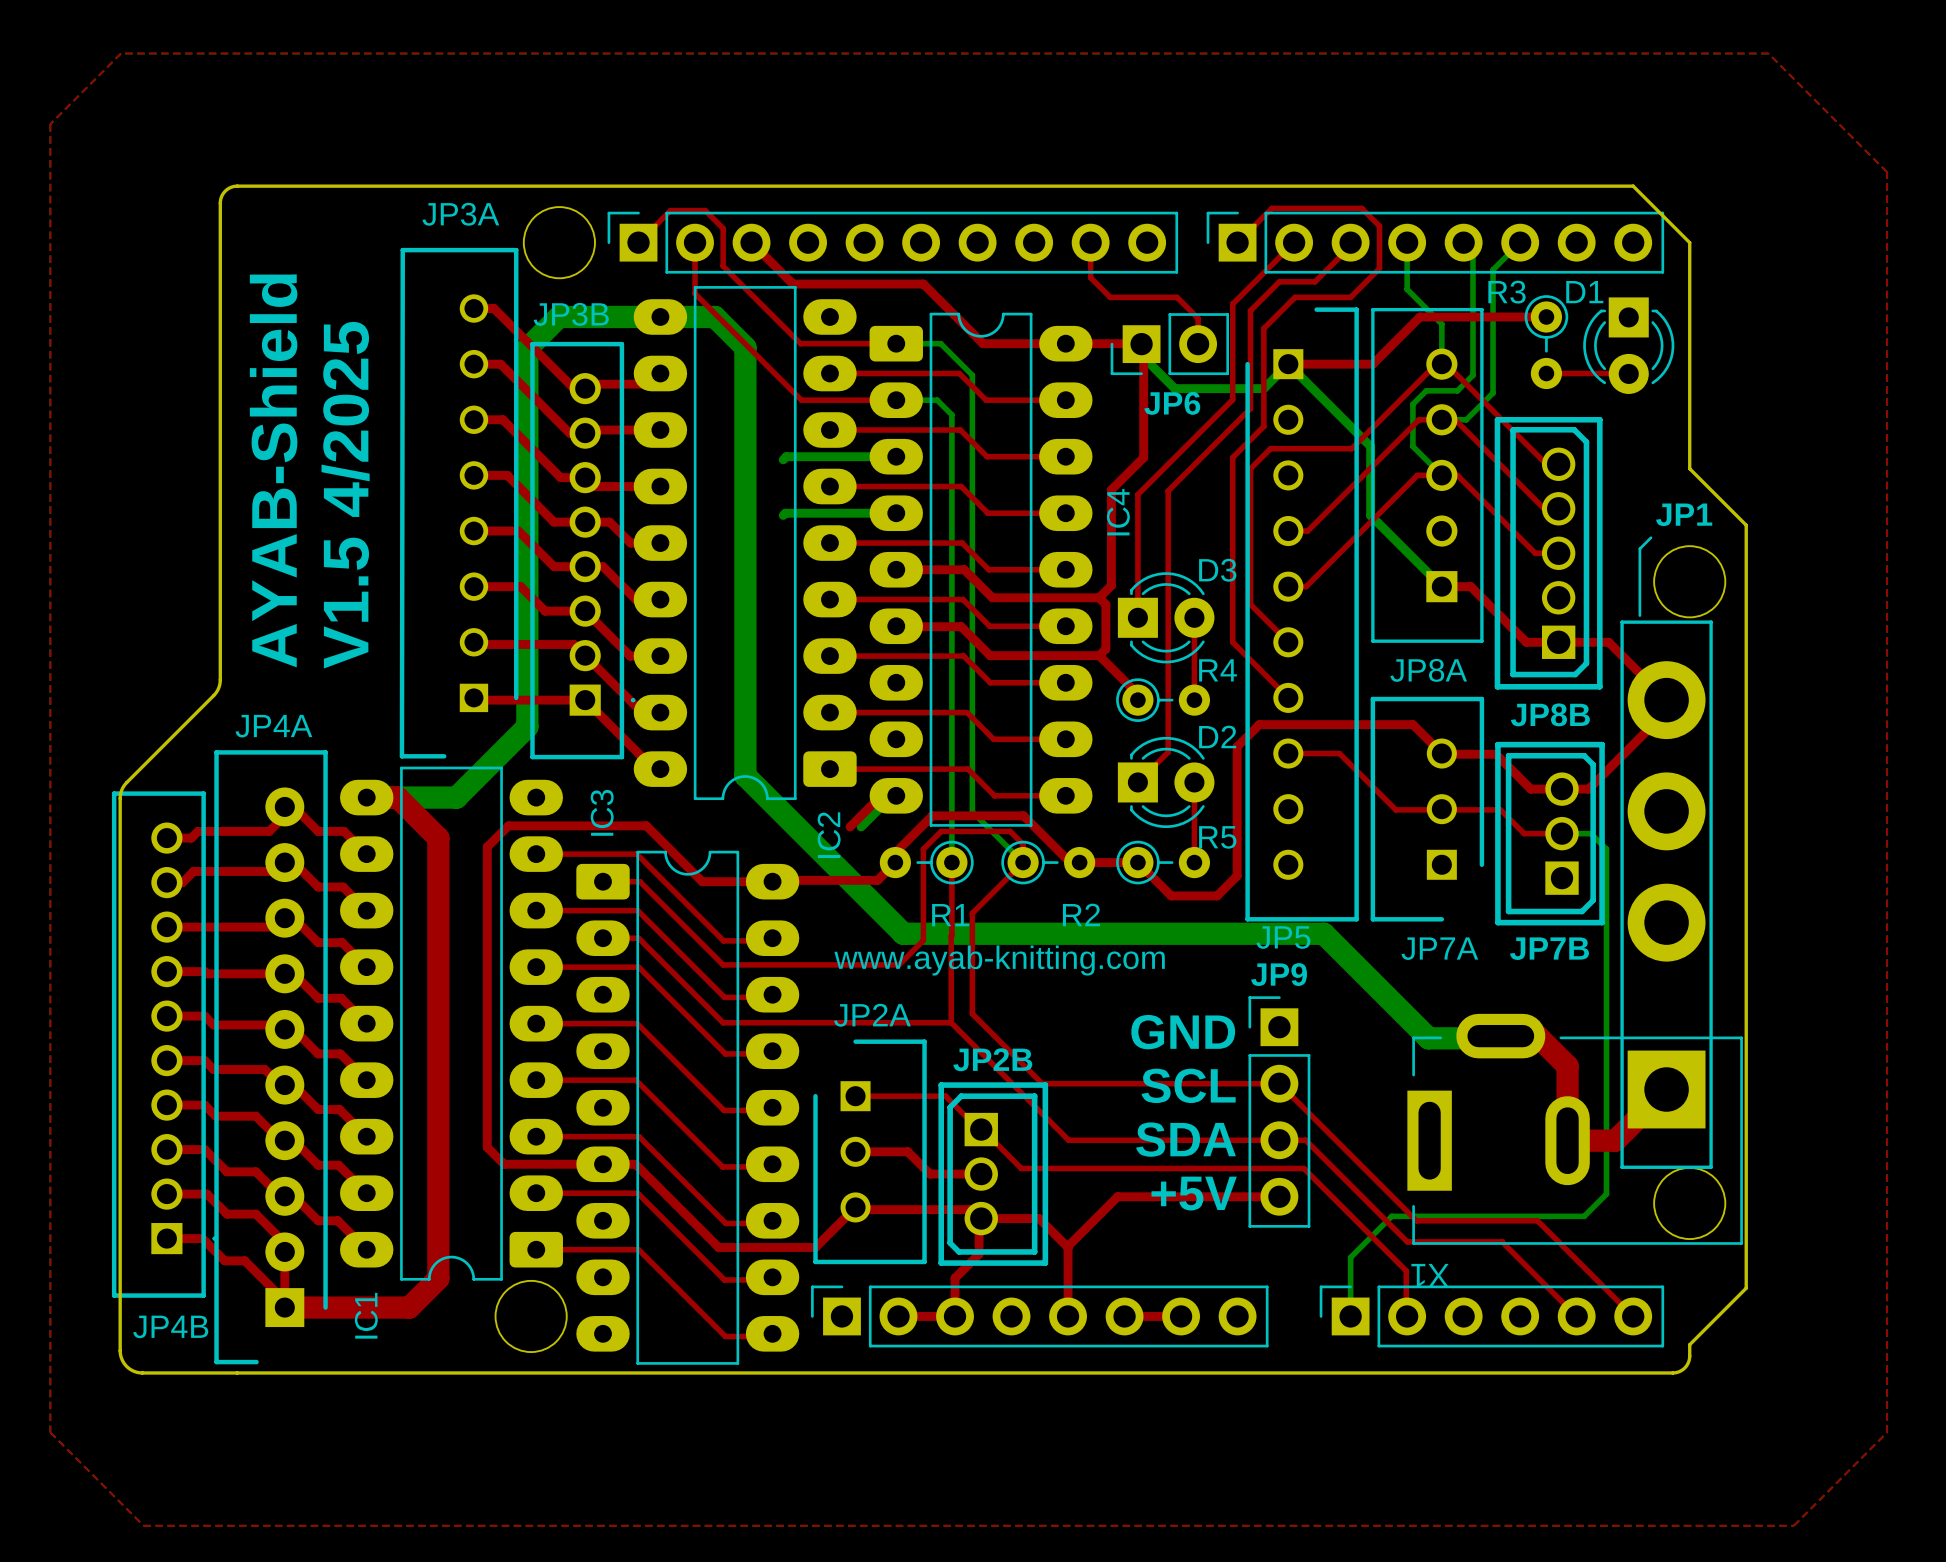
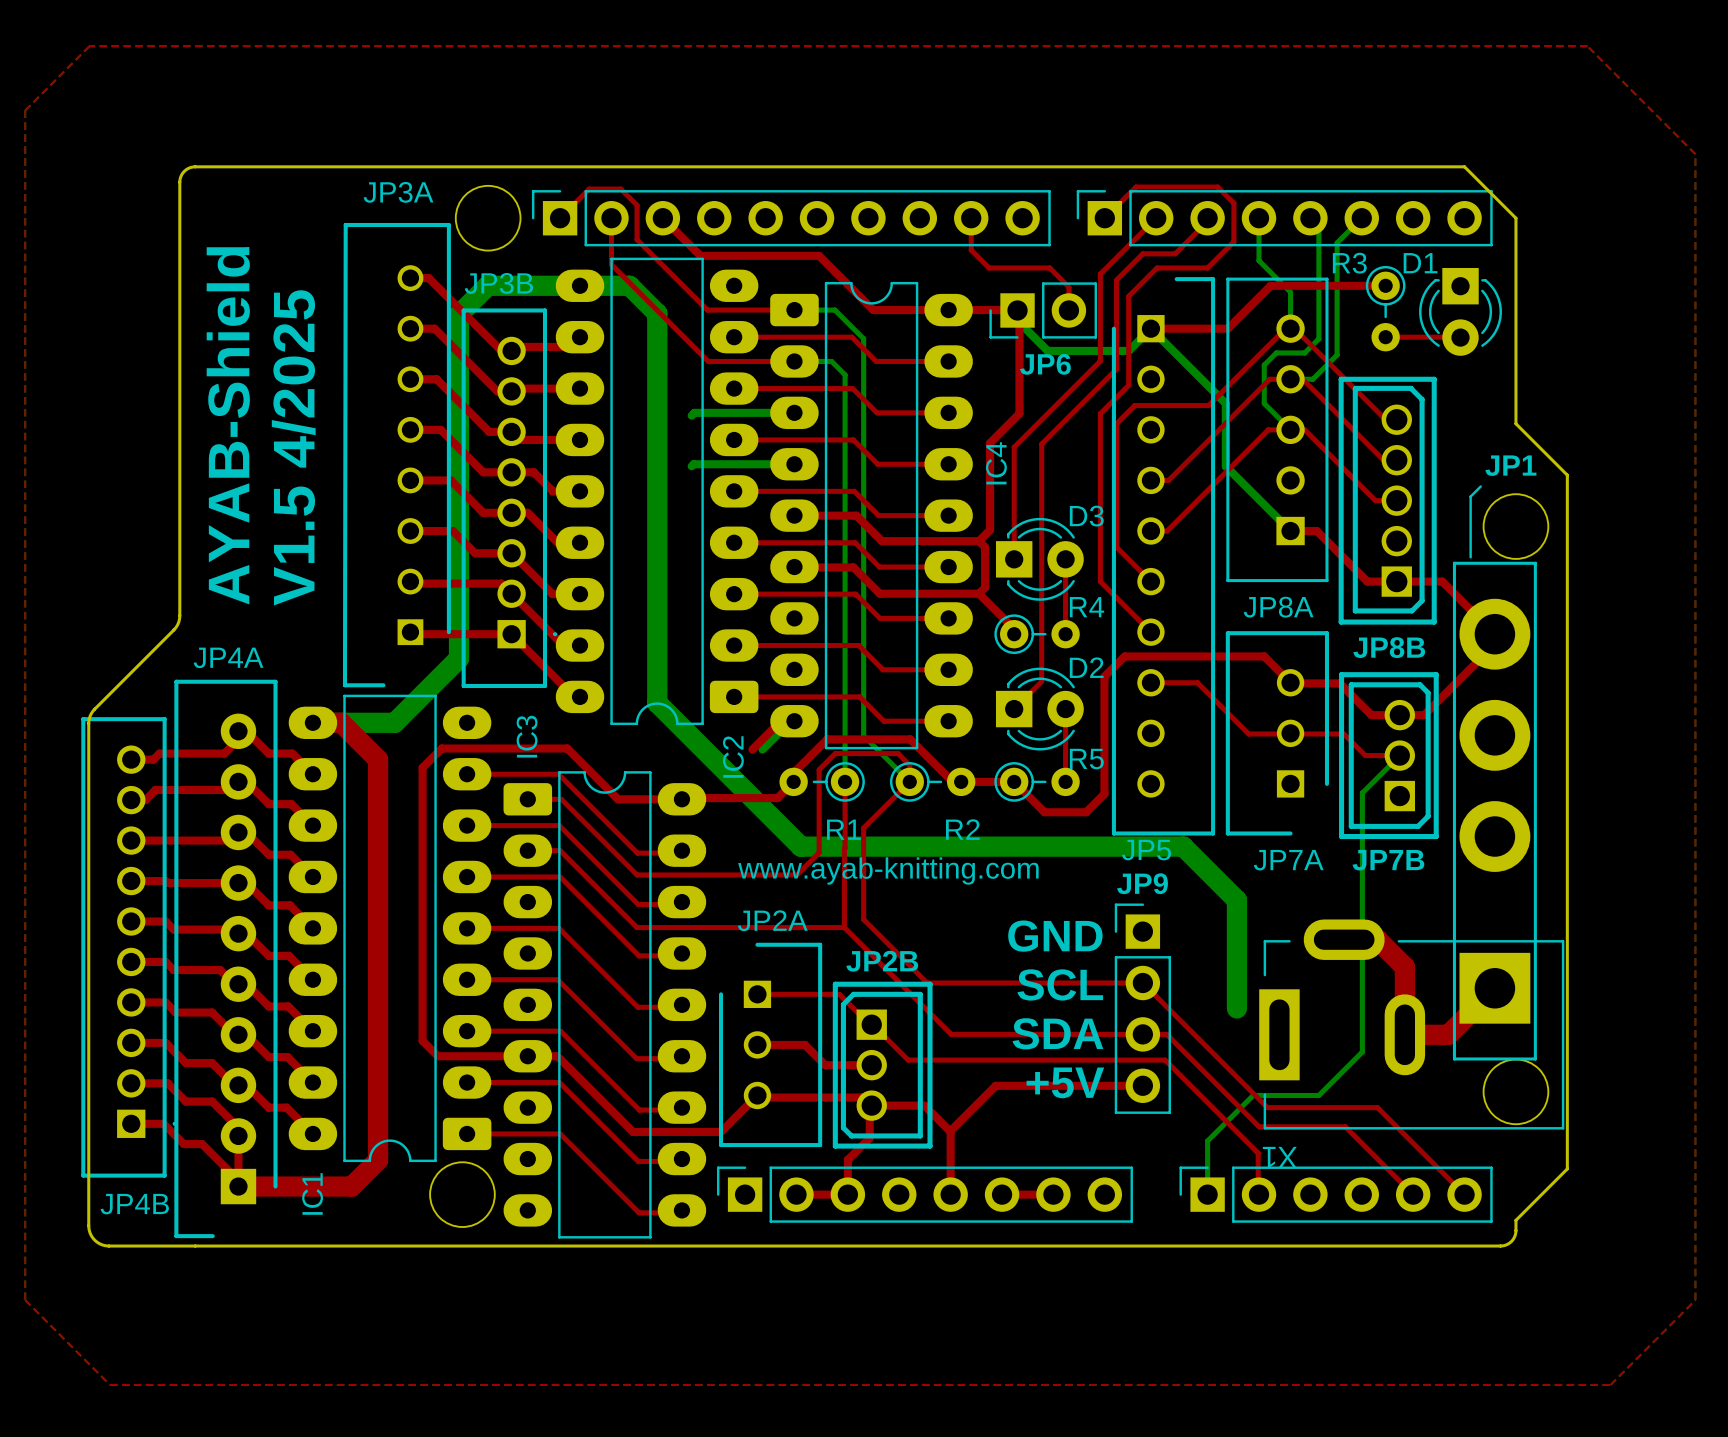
bottom track: (1562, 833) (1590, 833) (1606, 849) (1606, 1194) (1584, 1216) (1391, 1216) -> (1399, 755) (1362, 793) (1362, 1051) (1318, 1095) (1253, 1095) (1245, 1103)
bottom track: (1382, 992) (1428, 1038) (1498, 1038) (1500, 1036) -> (1236, 900) (1236, 1008)

